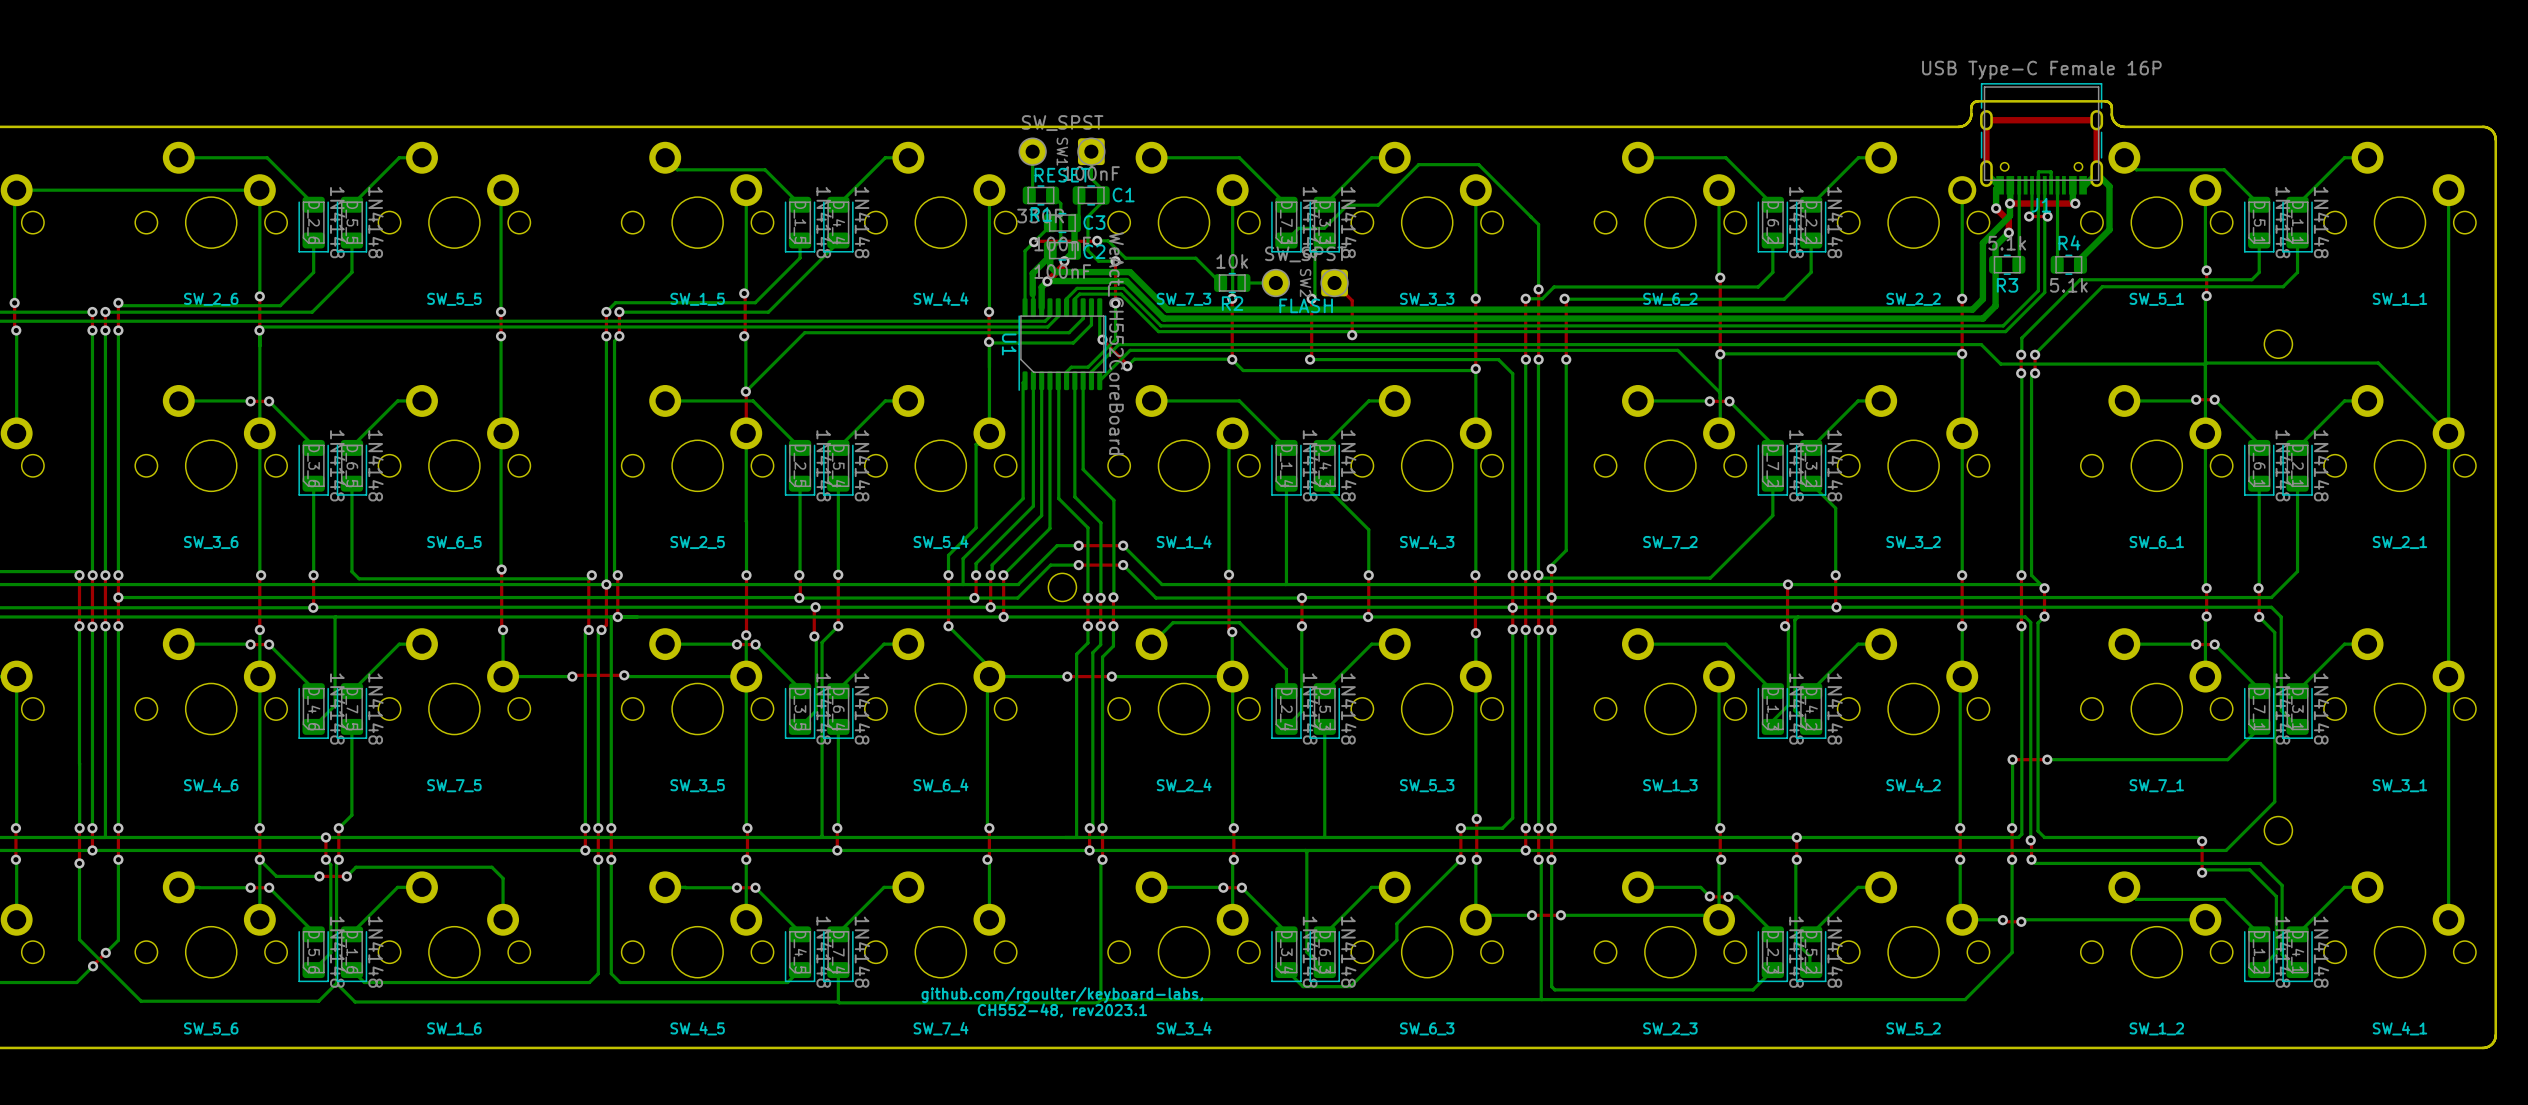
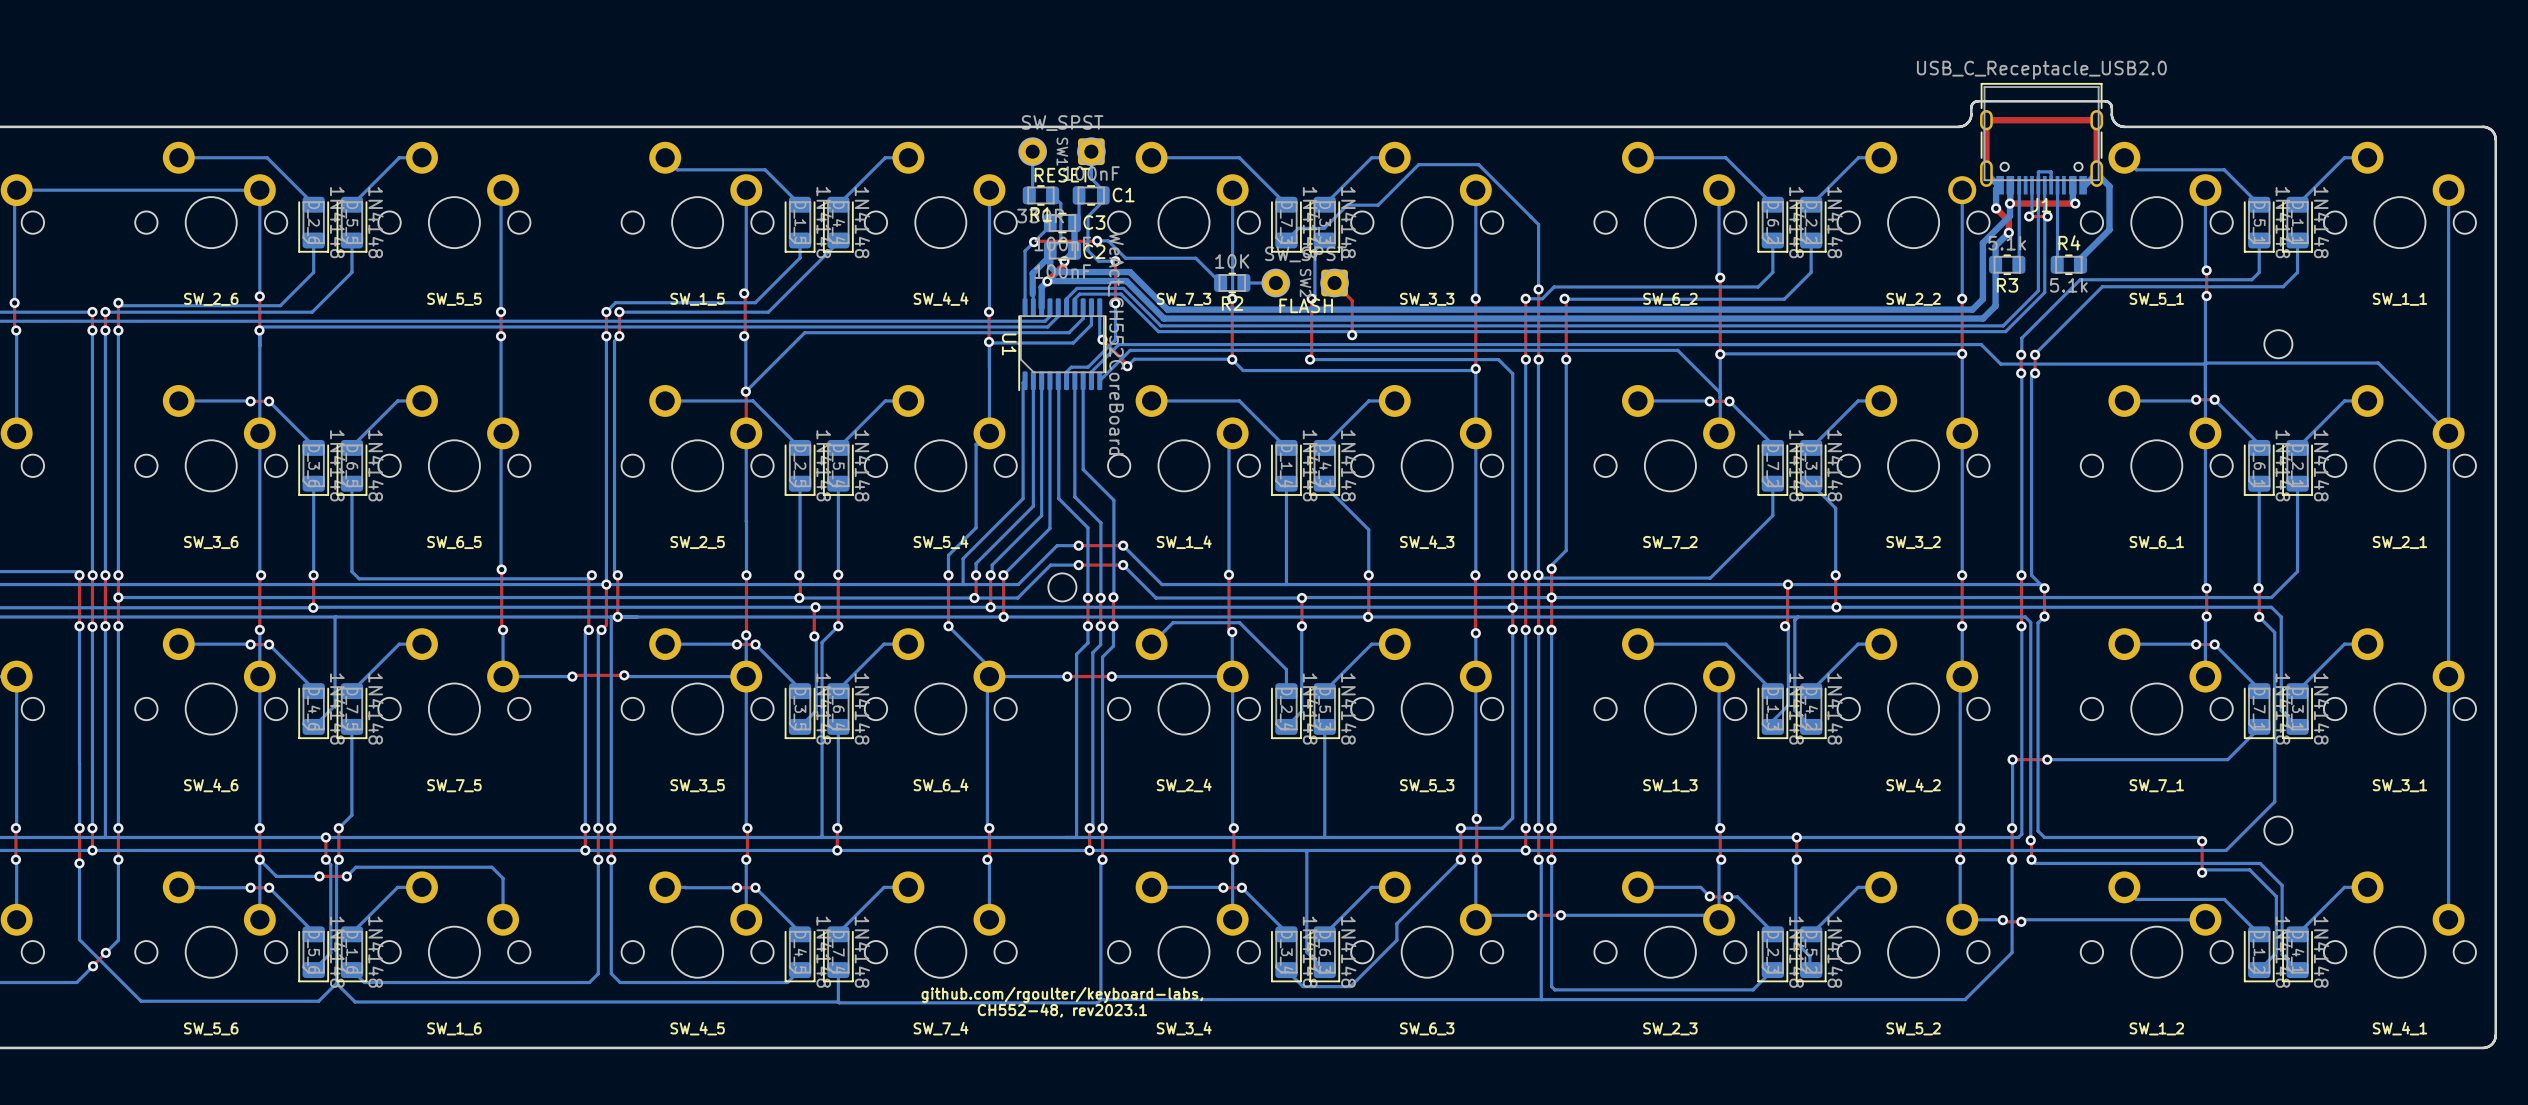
J1 value: USB Type-C Female 16P (2041, 70) -> USB_C_Receptacle_USB2.0 (2041, 70)
R2 value: 10k (1232, 261) -> 10K (1232, 261)

